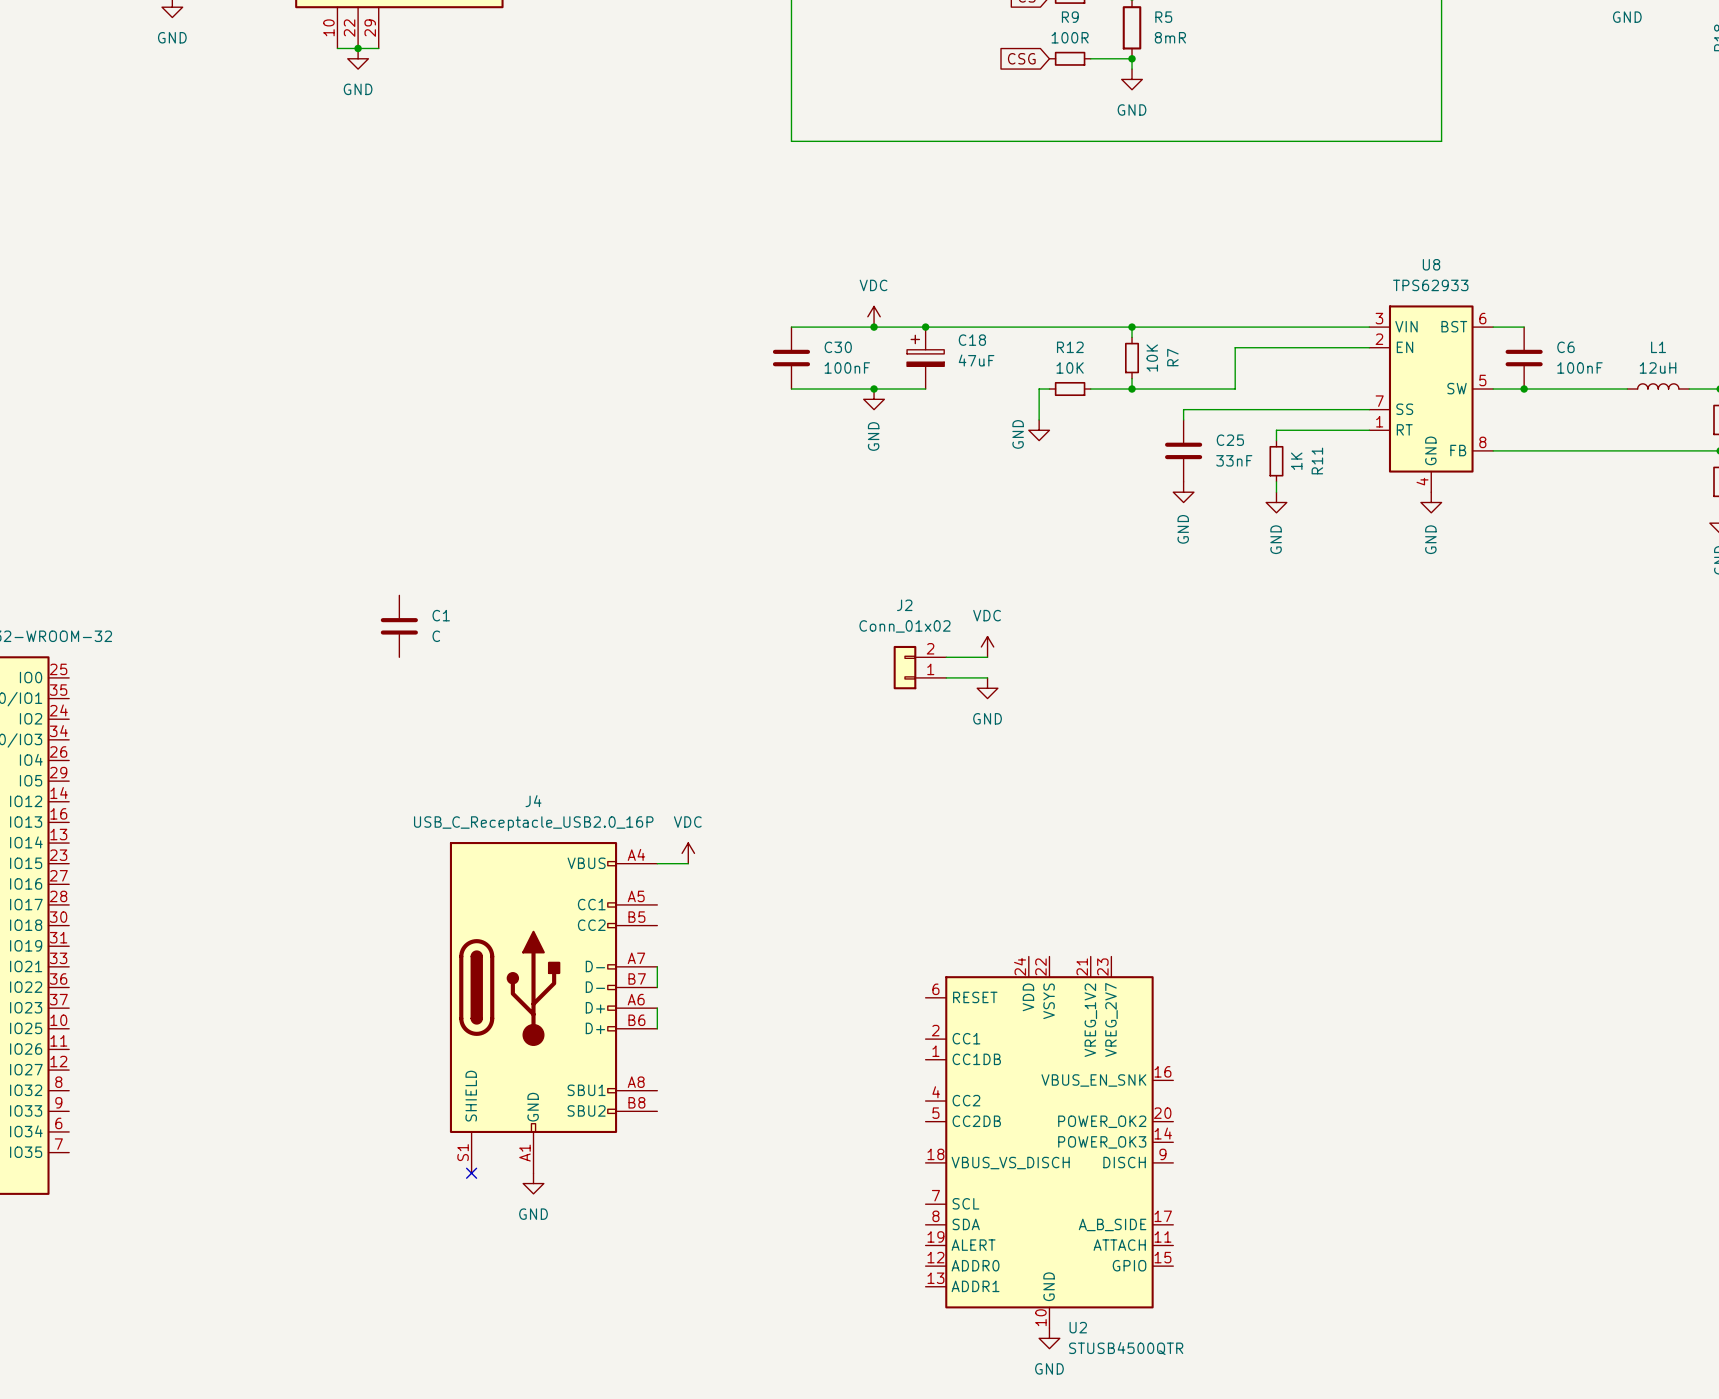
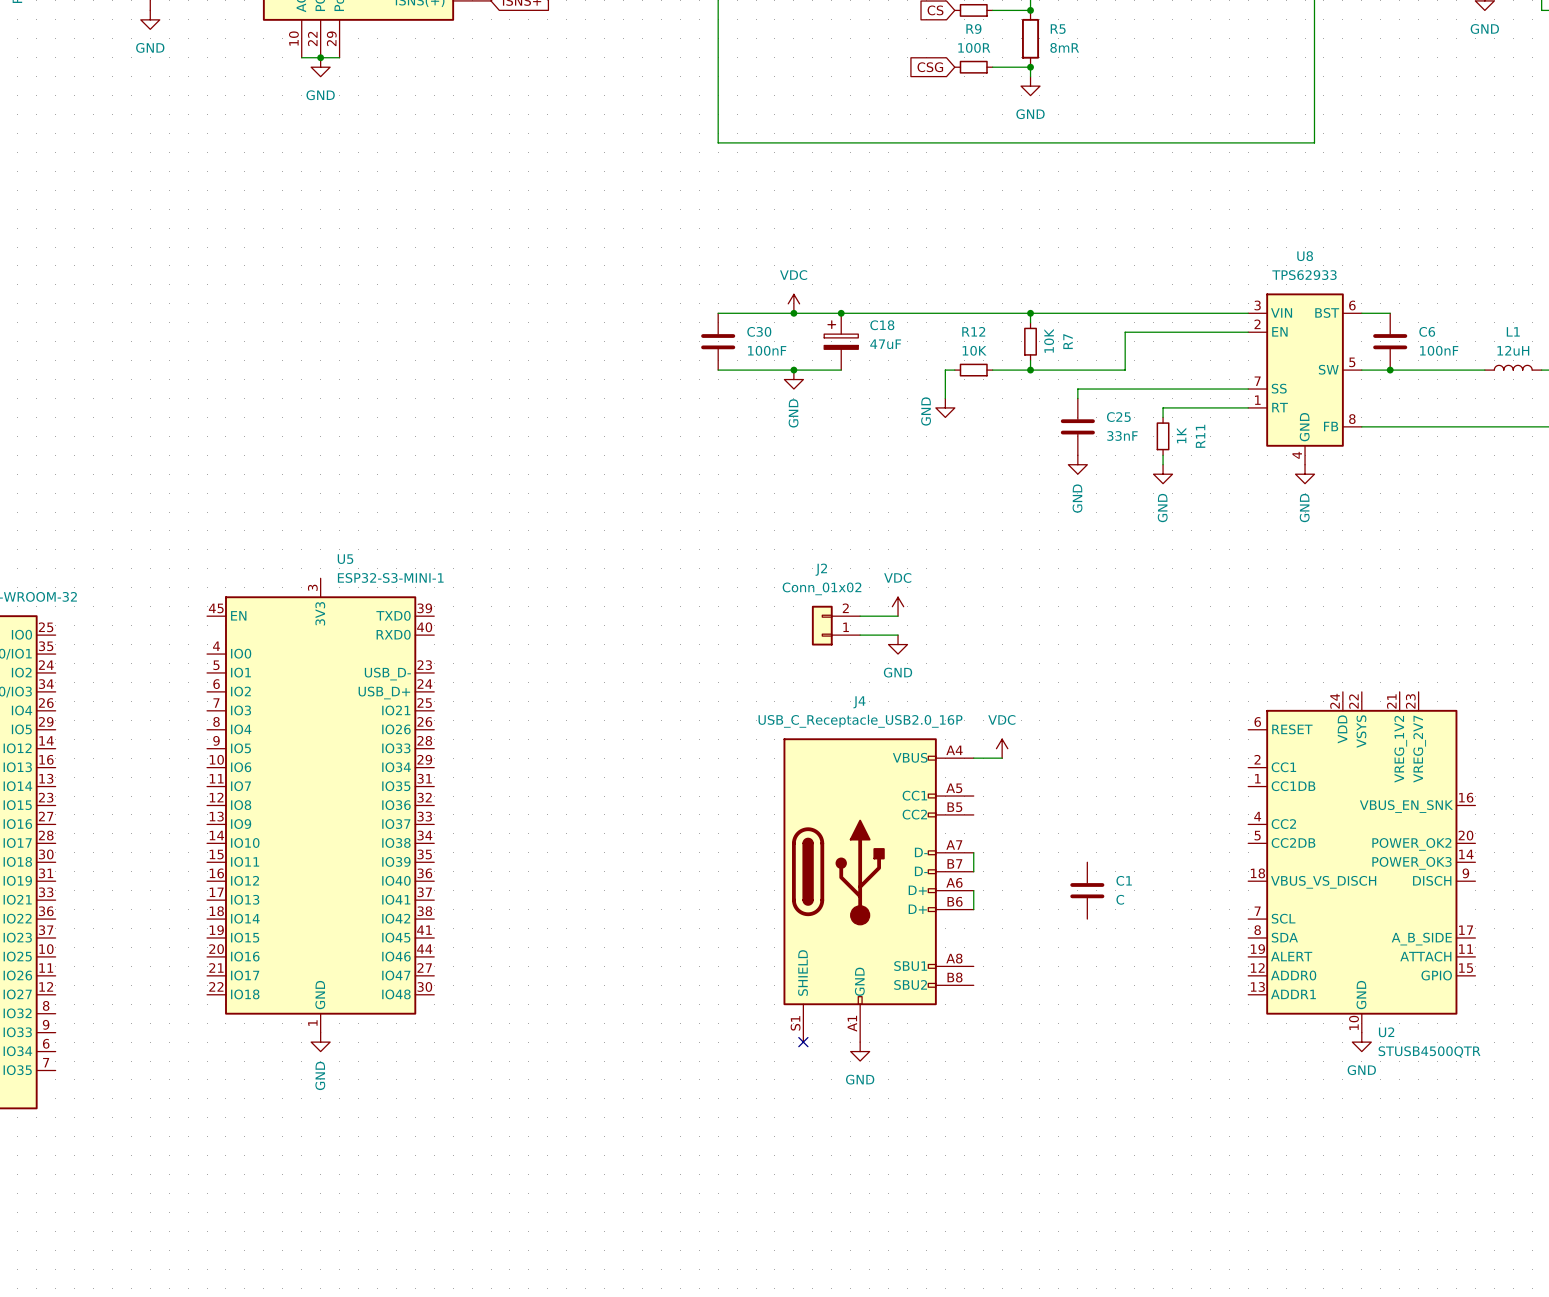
C1 position: (399, 626) -> (1087, 890)
power symbol: none -> VDC (1002, 748)
wire: none -> (973, 758) (1002, 758)
power symbol: VDC (688, 853) -> none
U5: none -> ESP32-S3-MINI-1 (320, 805)
wire: (657, 863) (688, 863) -> none
wire: none -> (973, 852) (973, 871)
wire: none -> (973, 890) (973, 909)
wire: (657, 966) (657, 987) -> none
J4 position: (553, 1007) -> (878, 890)
wire: (657, 1008) (657, 1028) -> none
no-connect mark: none -> (803, 1042)
power symbol: none -> GND (1361, 1042)
power symbol: none -> GND (860, 1051)
U2 position: (1049, 1142) -> (1361, 862)
no-connect mark: (471, 1173) -> none
power symbol position: GND (533, 1183) -> GND (320, 1042)
power symbol text rotation: 0° (533, 1214) -> 90° counterclockwise (320, 1075)
power symbol: GND (1049, 1338) -> none

